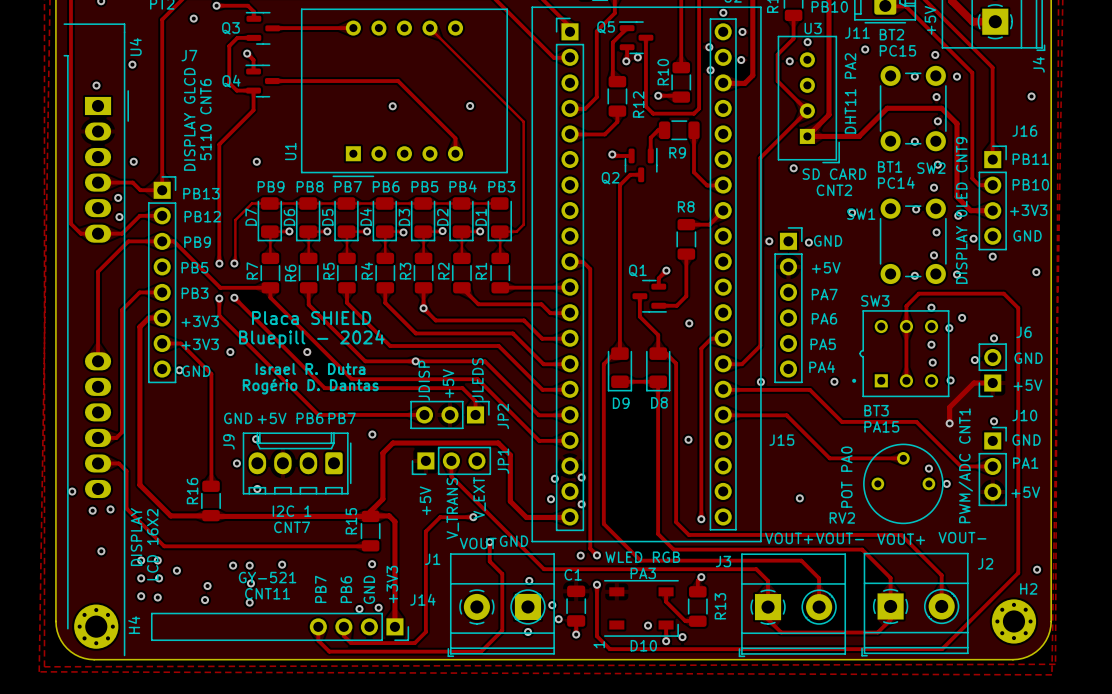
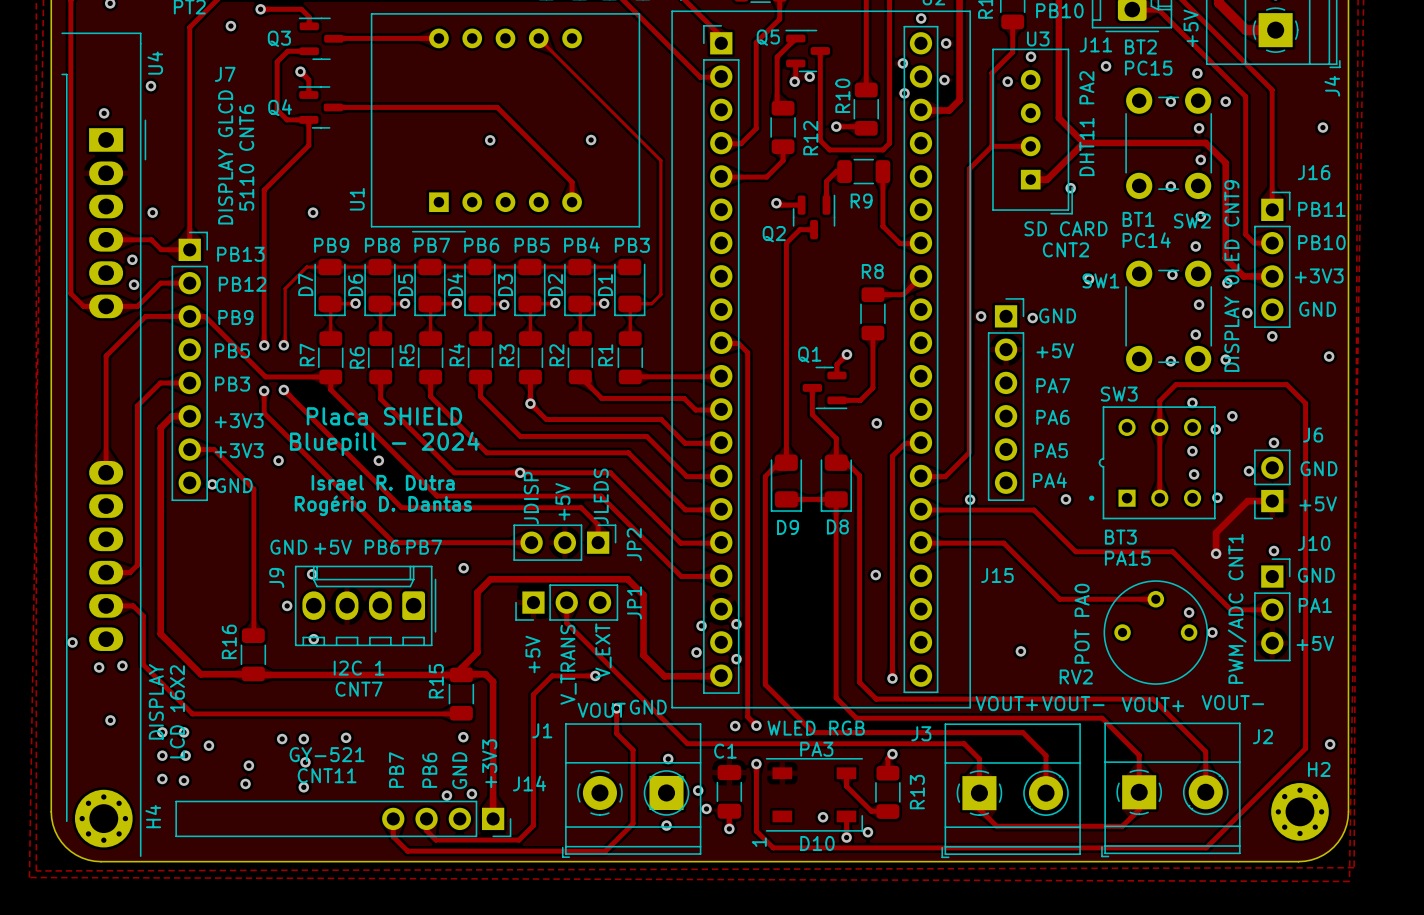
track: (777, 81) (807, 110) (760, 157) -> (991, 146) (969, 168) (969, 207)
track: none -> (991, 107) (991, 146)
track: (829, 89) (829, 114) (807, 136) -> (1058, 118) (1083, 142)
track: none -> (1083, 142) (1134, 142)
track: (887, 108) (859, 136) (819, 136) -> (1083, 142) (1047, 179)
track: none -> (991, 146) (1030, 146)
via position: (793, 168) -> (1070, 188)

